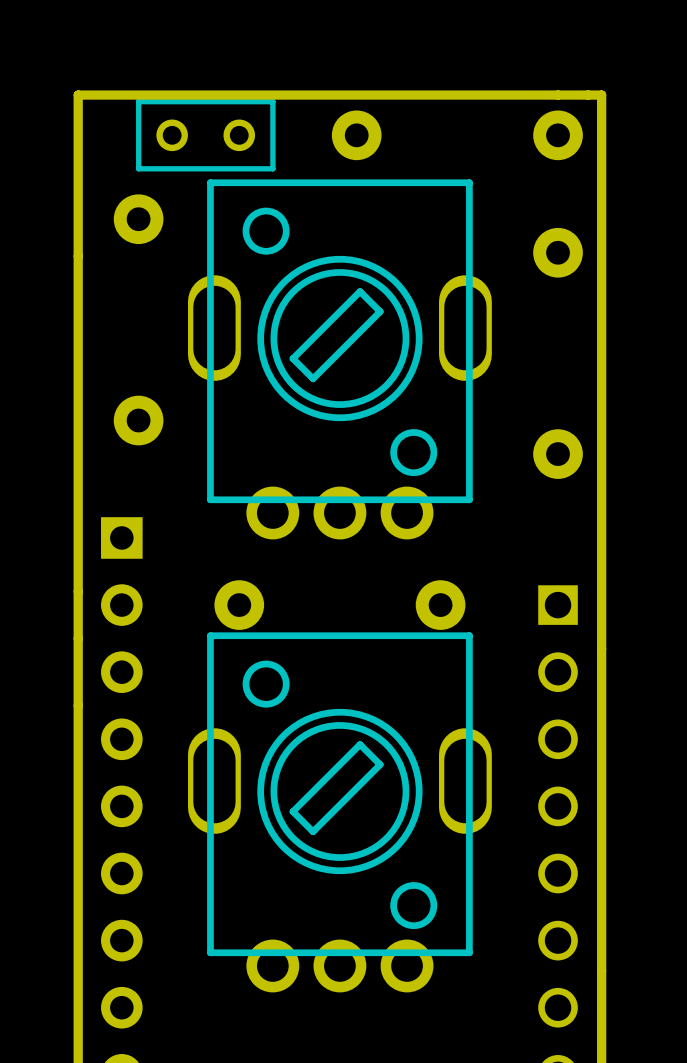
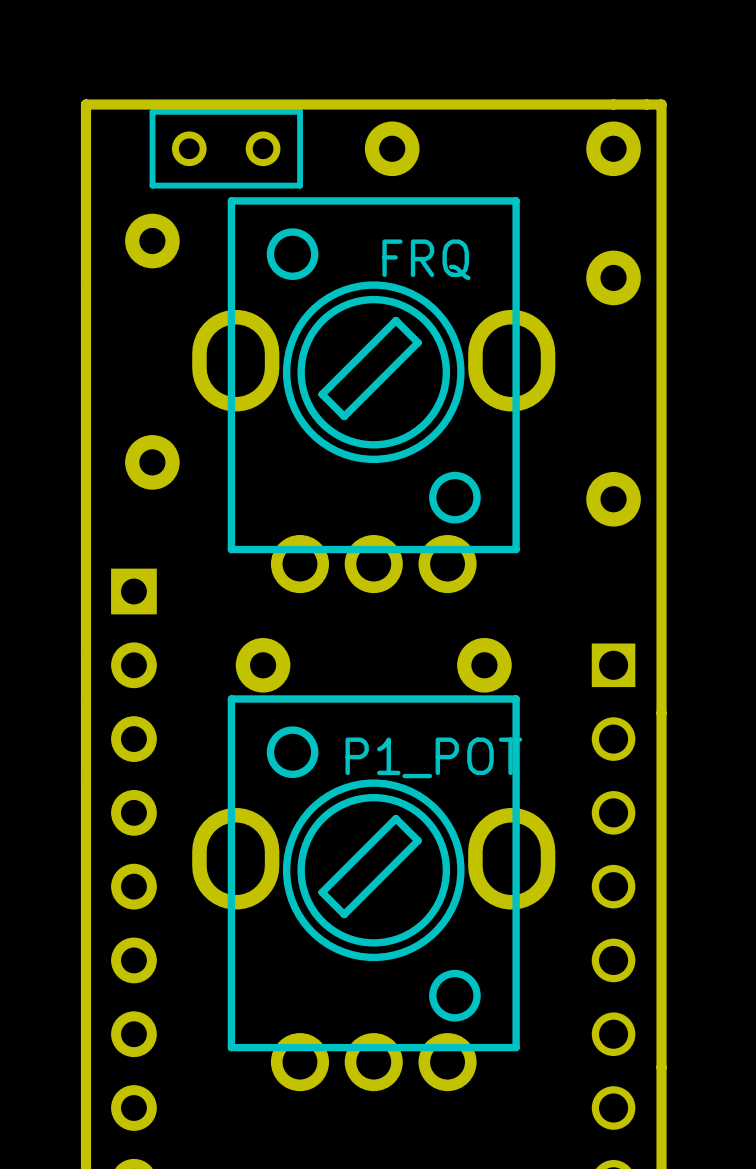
part: (339, 359) -> none
FRQ: none -> (373, 395)
part: (339, 812) -> none
P1_POT: none -> (373, 893)

